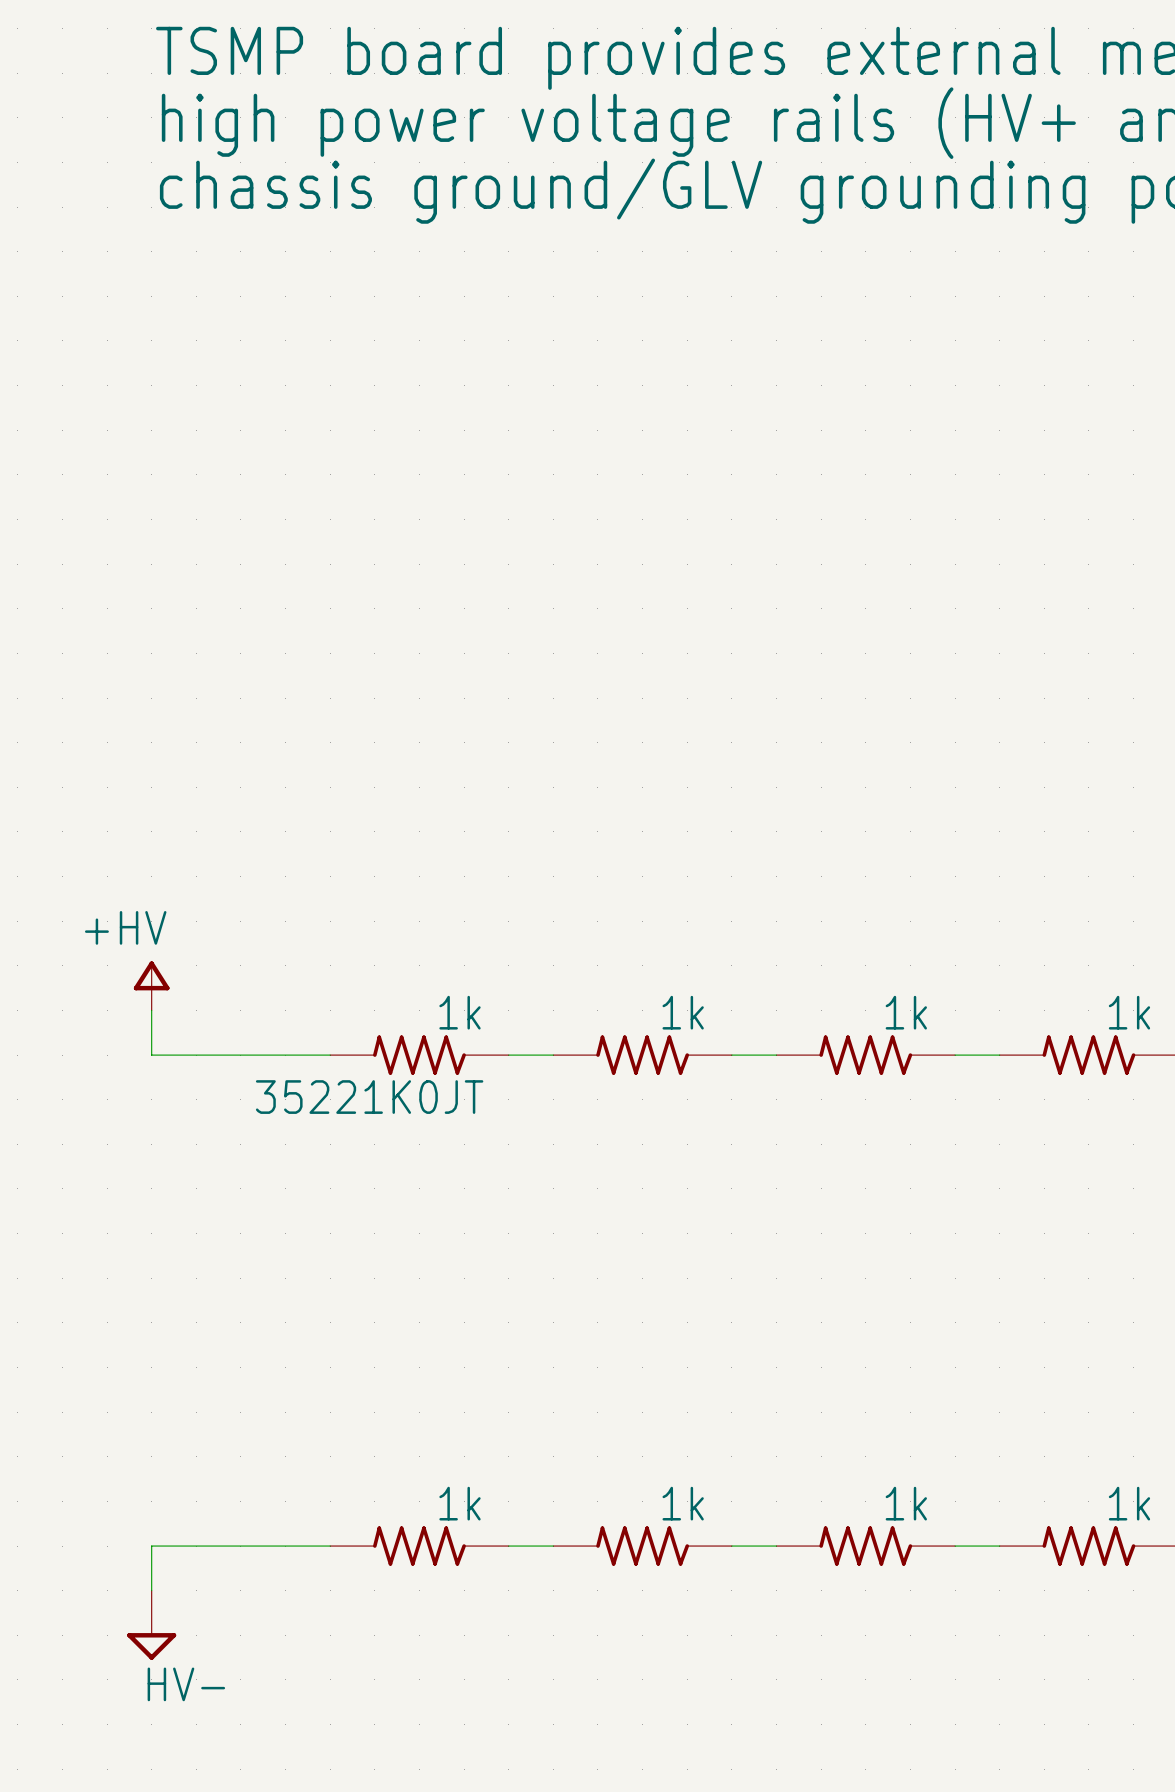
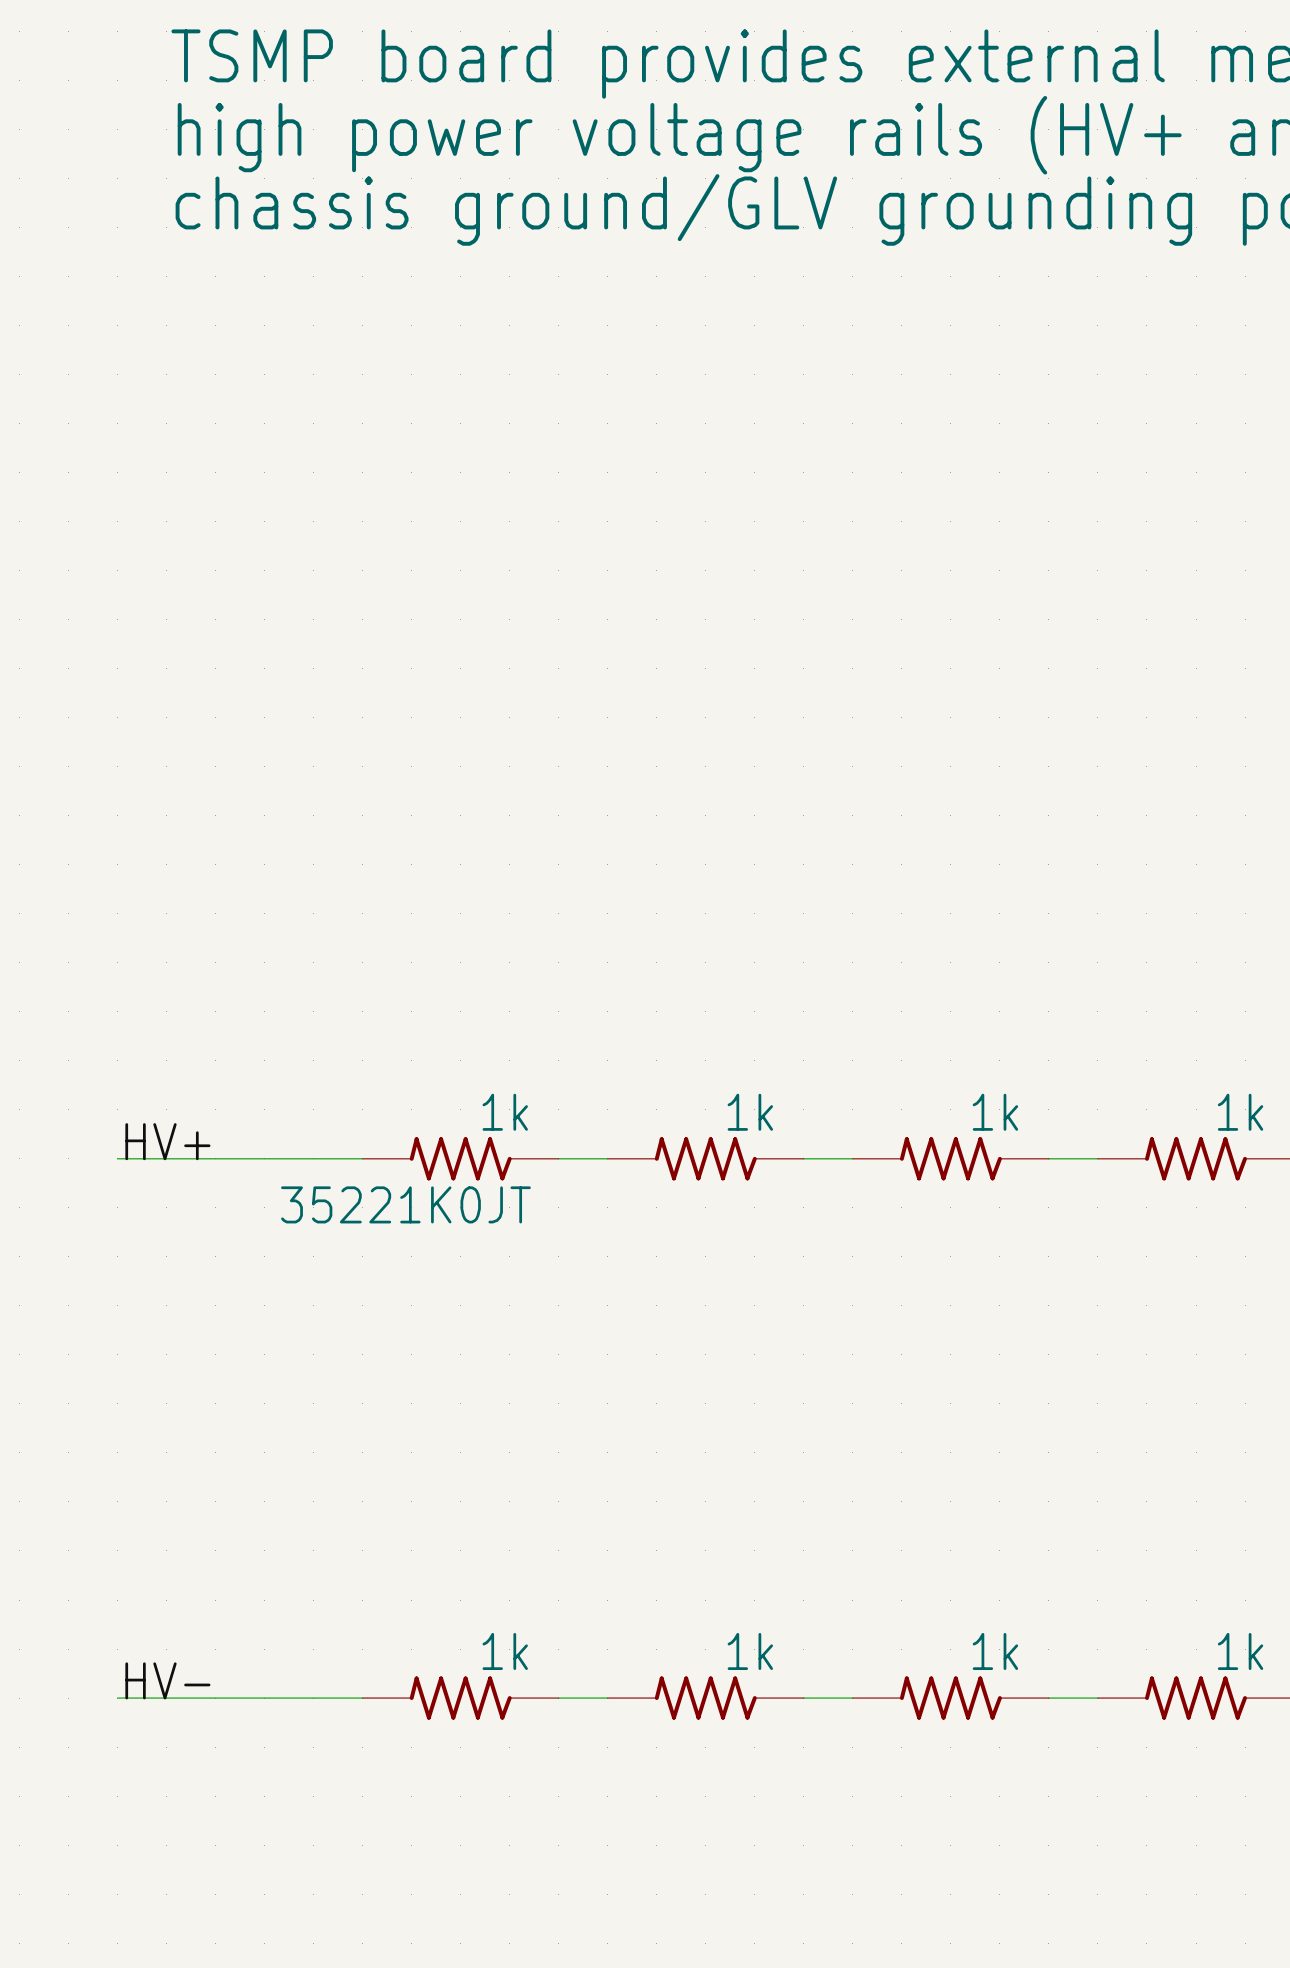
power symbol: +HV (151, 985) -> none
wire: (151, 1010) (151, 1055) -> (117, 1158) (166, 1158)
label: none -> HV+ (167, 1141)
label: none -> HV- (167, 1680)
wire: (151, 1546) (151, 1590) -> (166, 1698) (117, 1698)
power symbol: HV- (151, 1625) -> none

